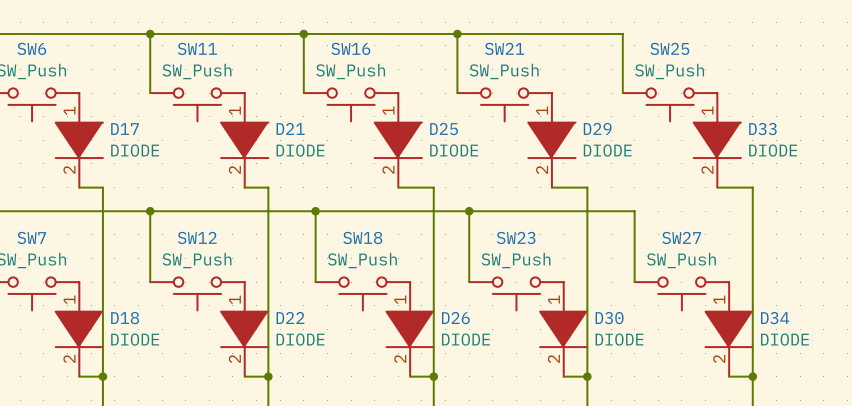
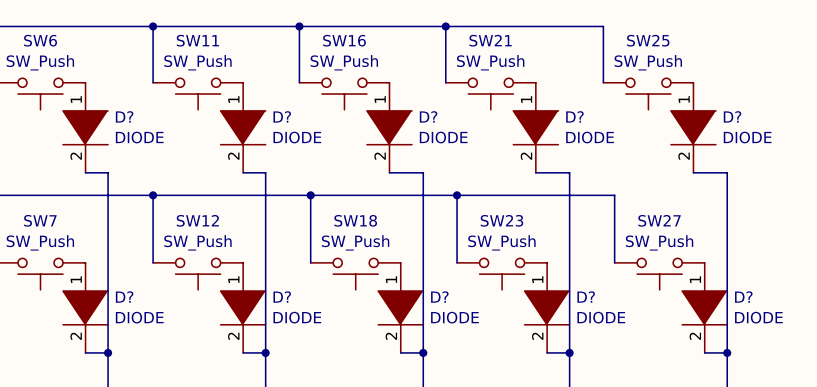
D21 name: D21 (290, 128) -> D? (282, 116)
D29 name: D29 (597, 128) -> D? (574, 116)
D17 name: D17 (125, 129) -> D? (124, 116)
D25 name: D25 (444, 129) -> D? (428, 116)
D33 name: D33 (762, 129) -> D? (732, 116)
D22 name: D22 (290, 317) -> D? (282, 297)
D18 name: D18 (125, 318) -> D? (124, 297)
D26 name: D26 (455, 318) -> D? (439, 297)
D30 name: D30 (609, 318) -> D? (586, 297)
D34 name: D34 (775, 318) -> D? (743, 297)

